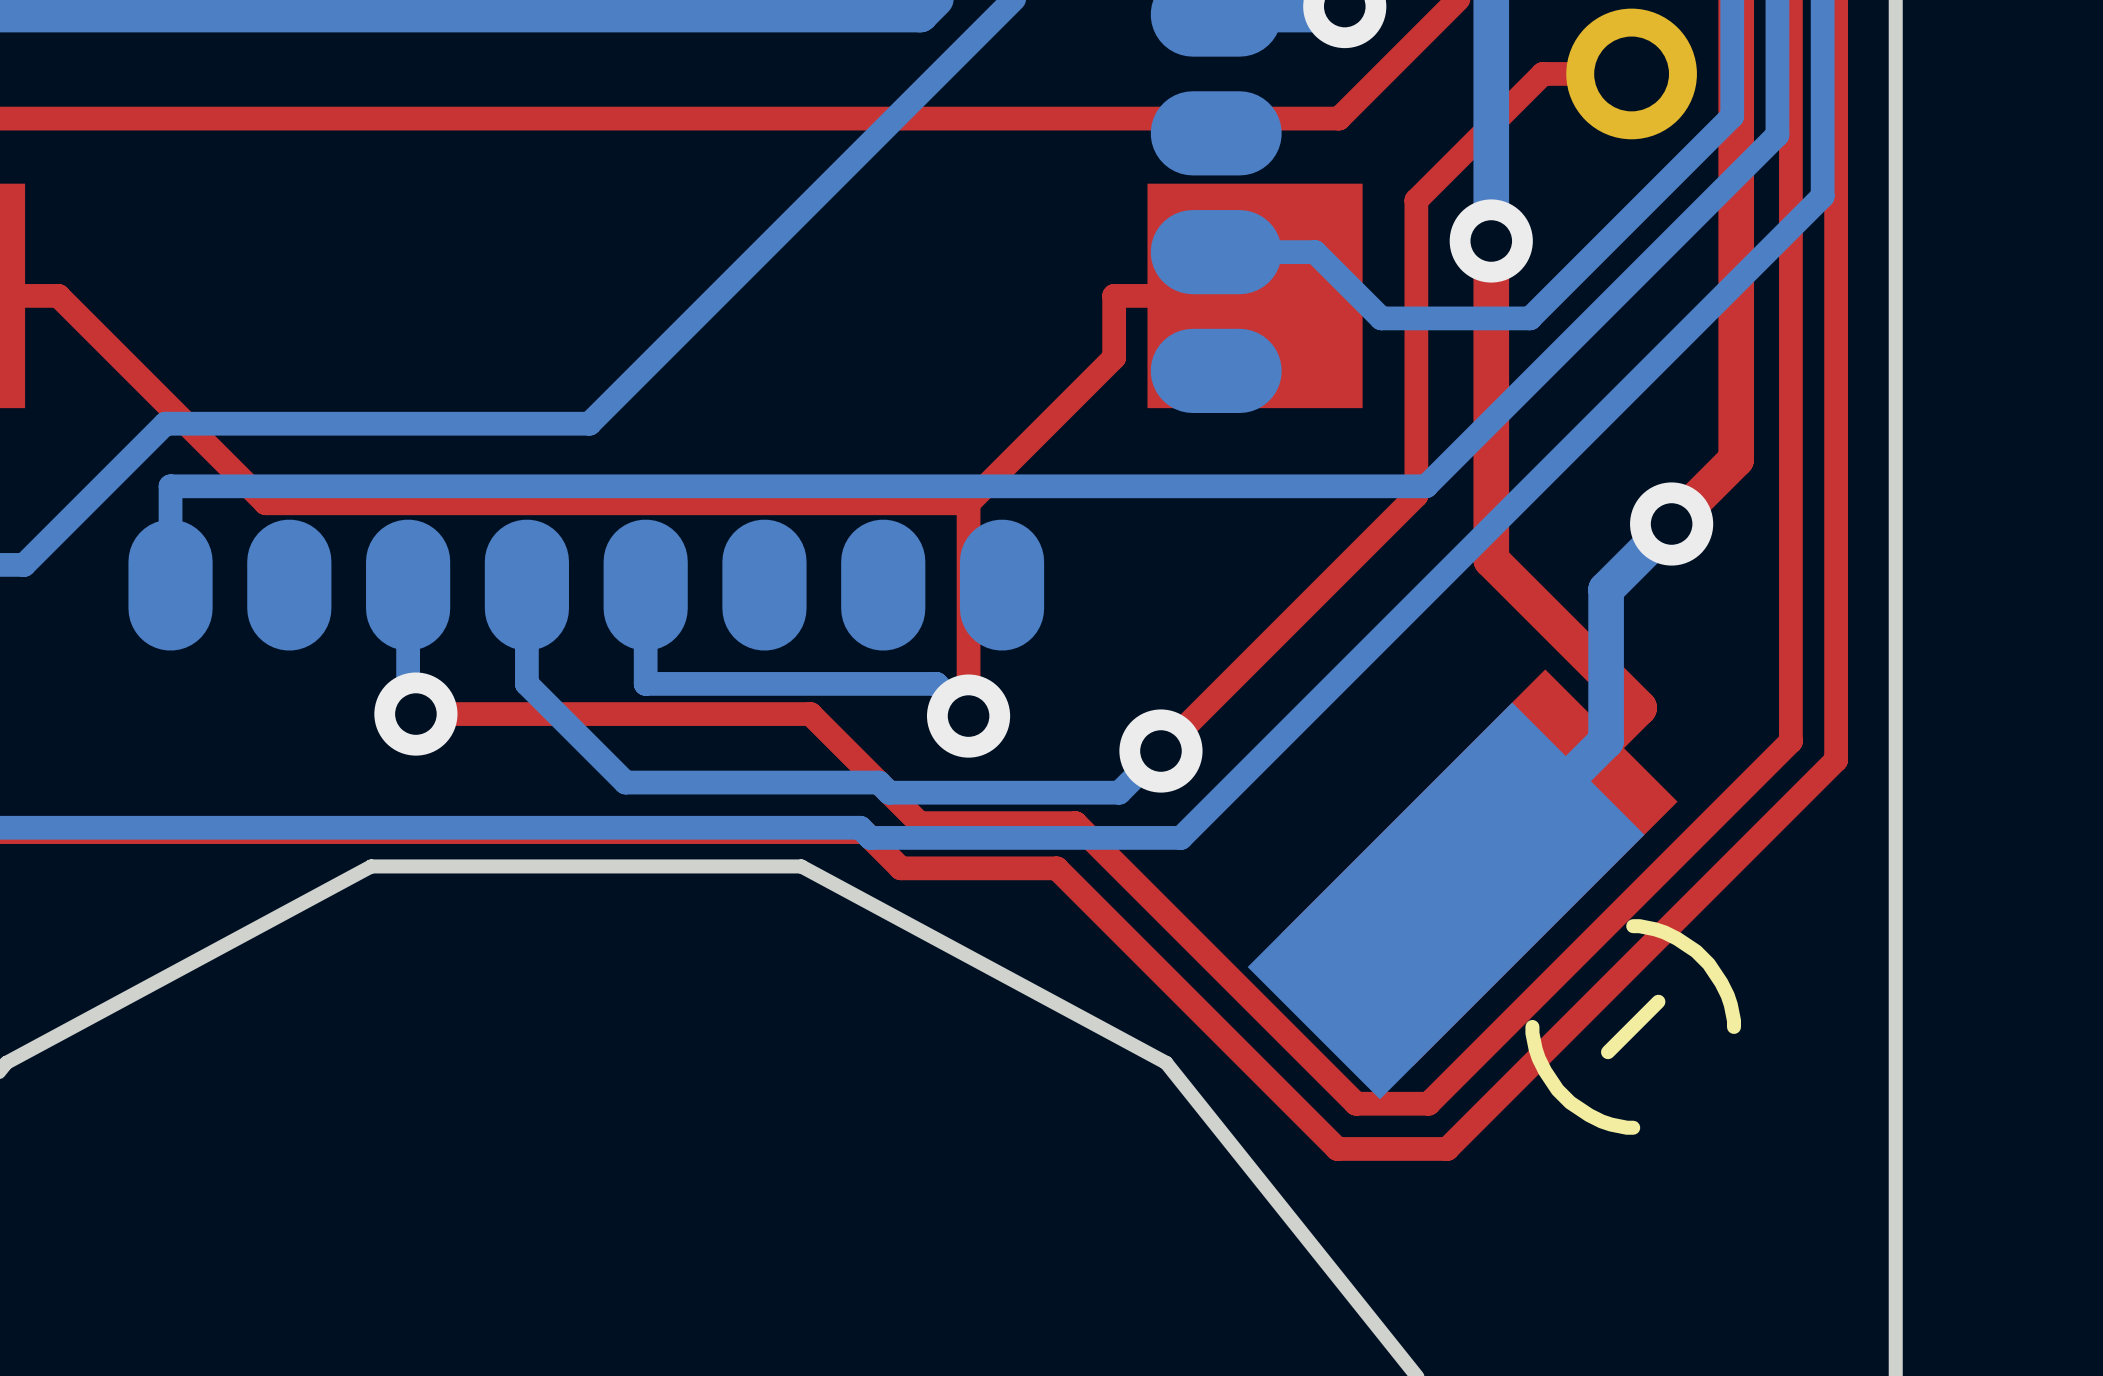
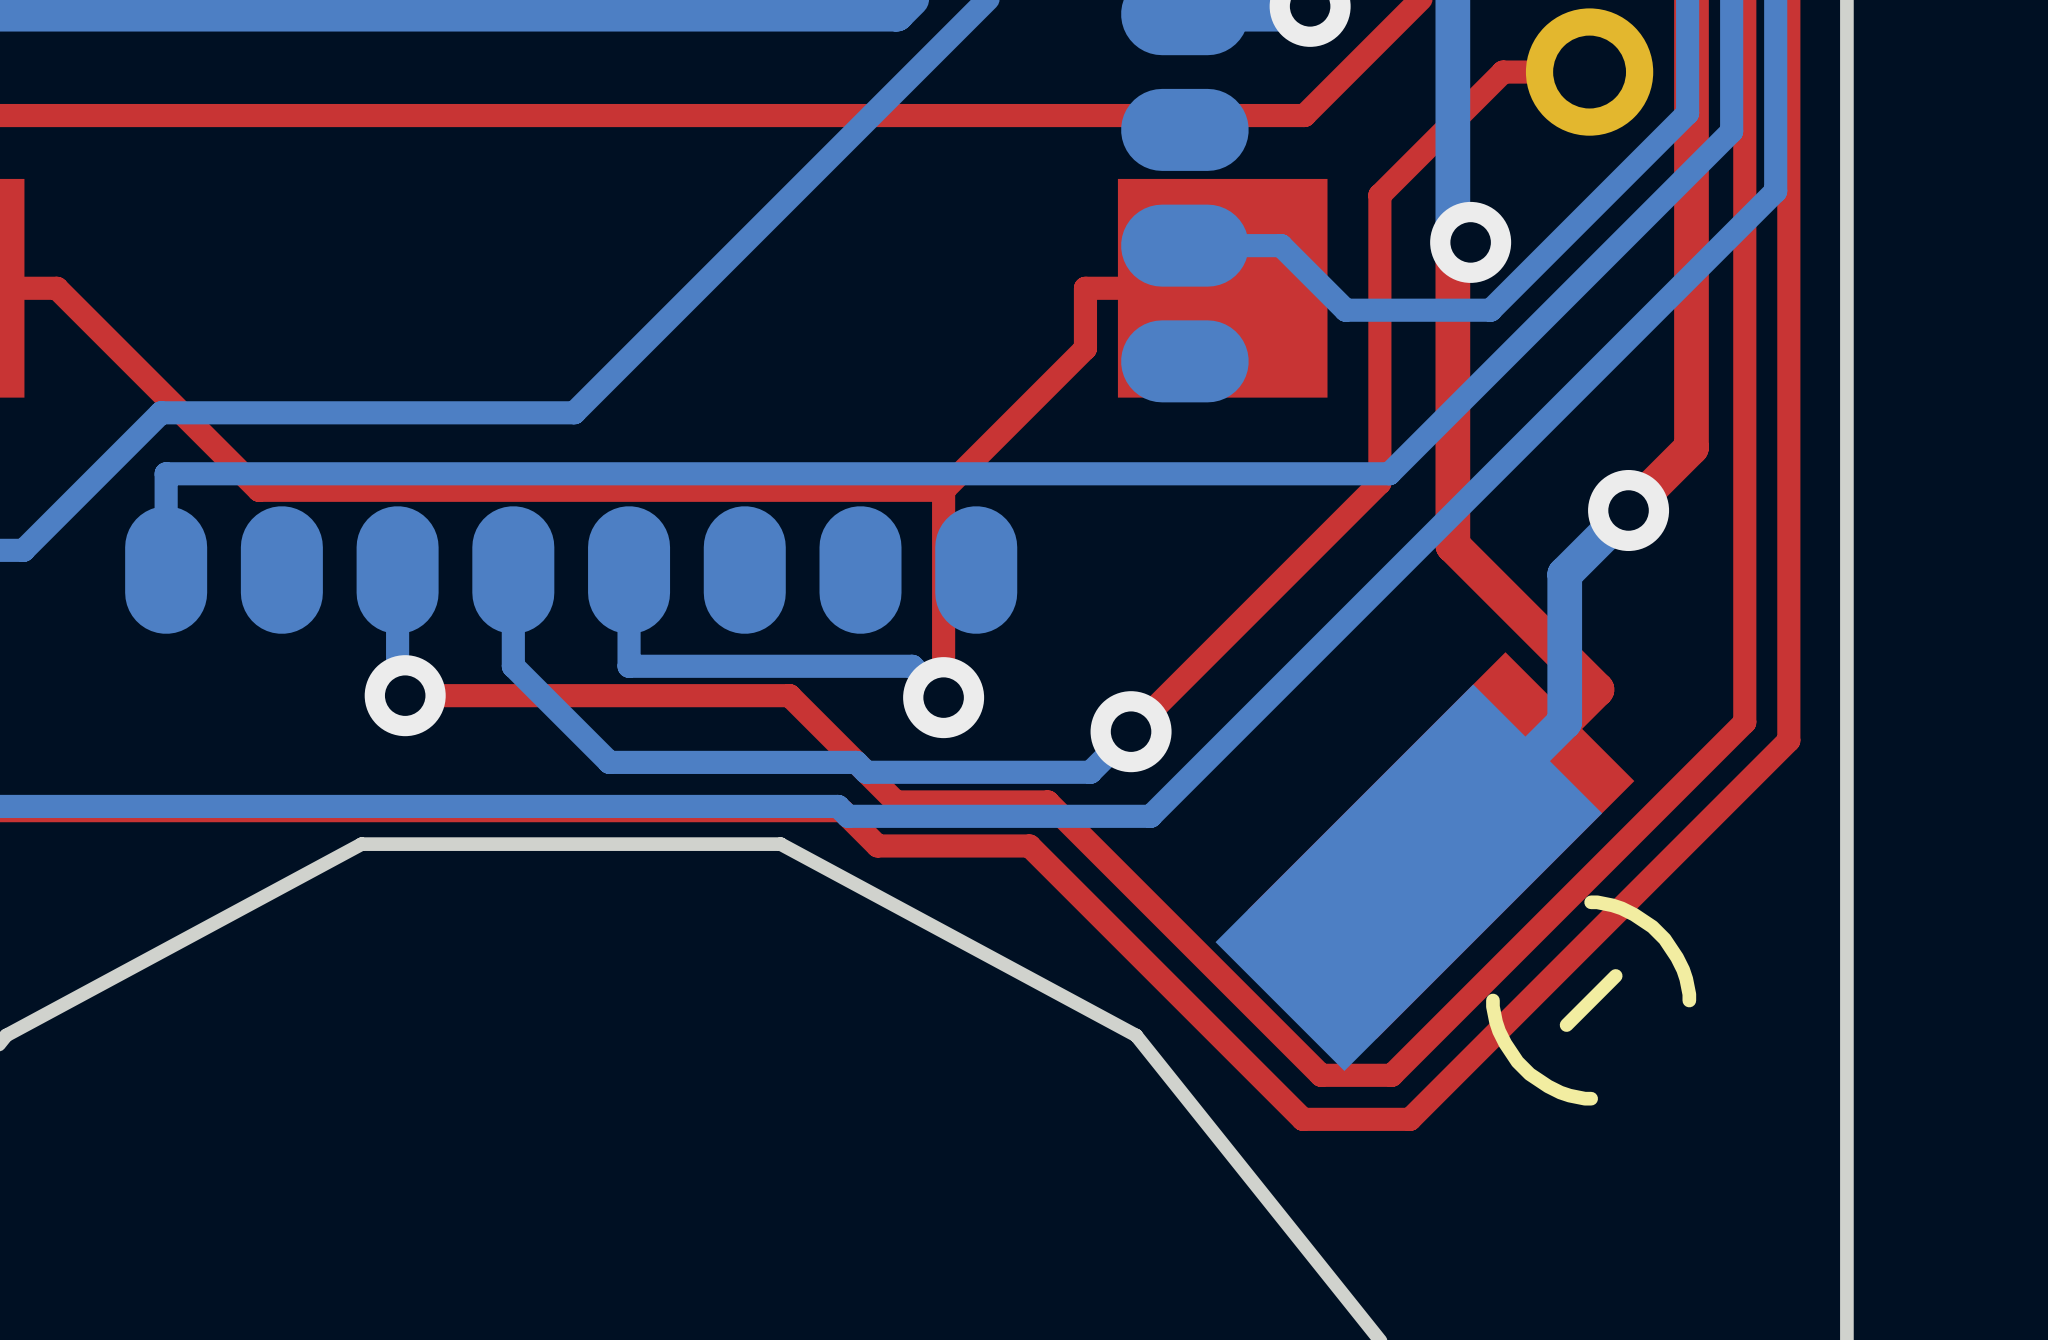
via position: (1491, 241) -> (1470, 242)

